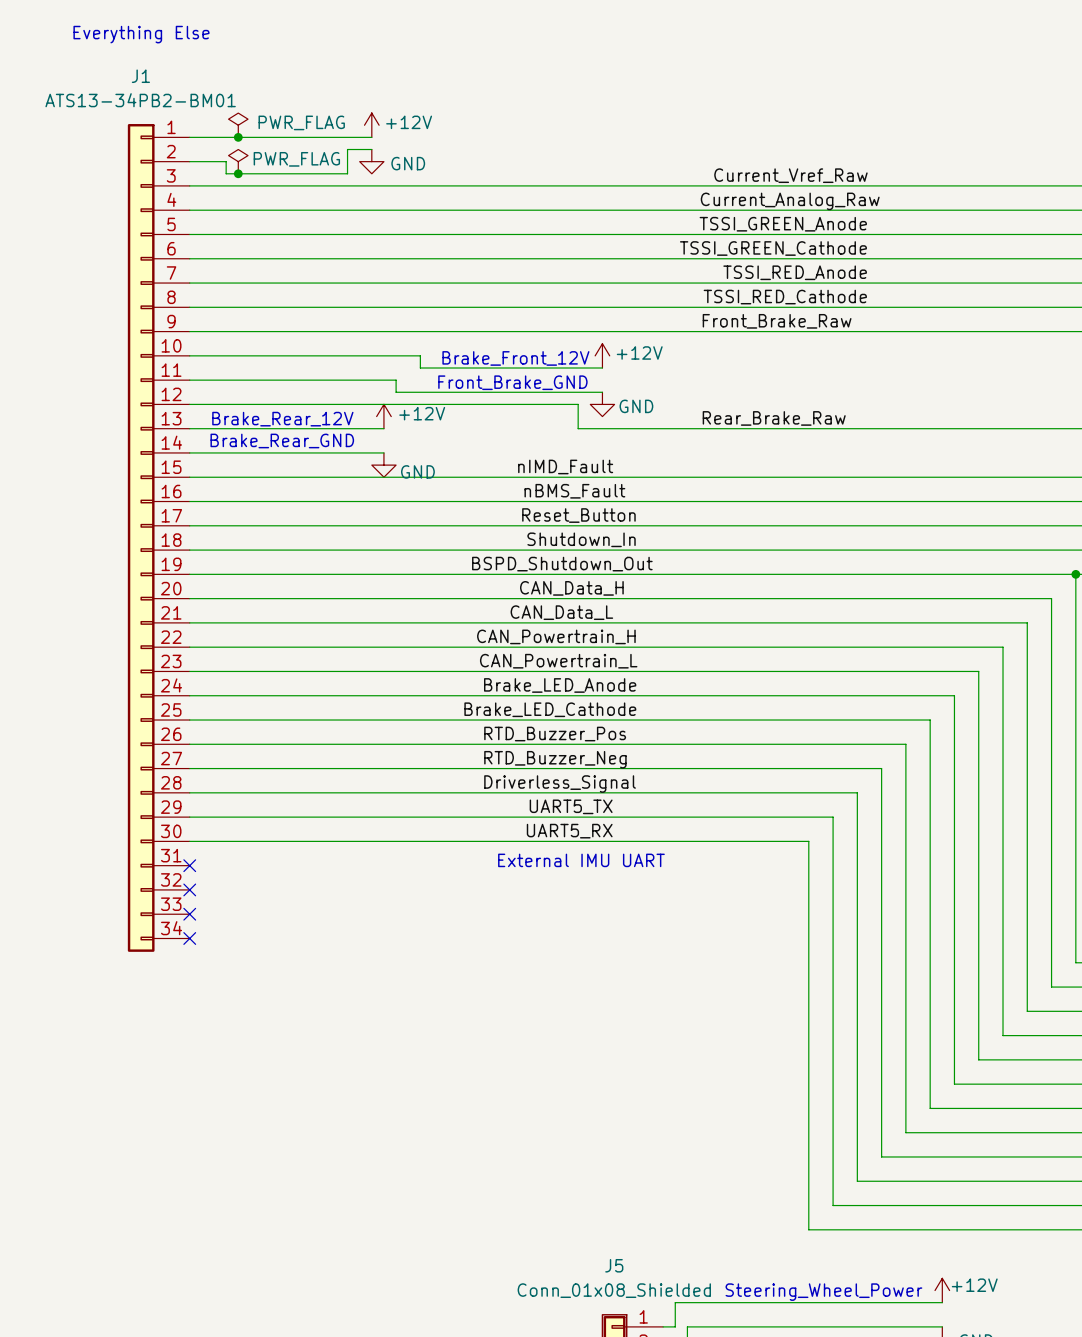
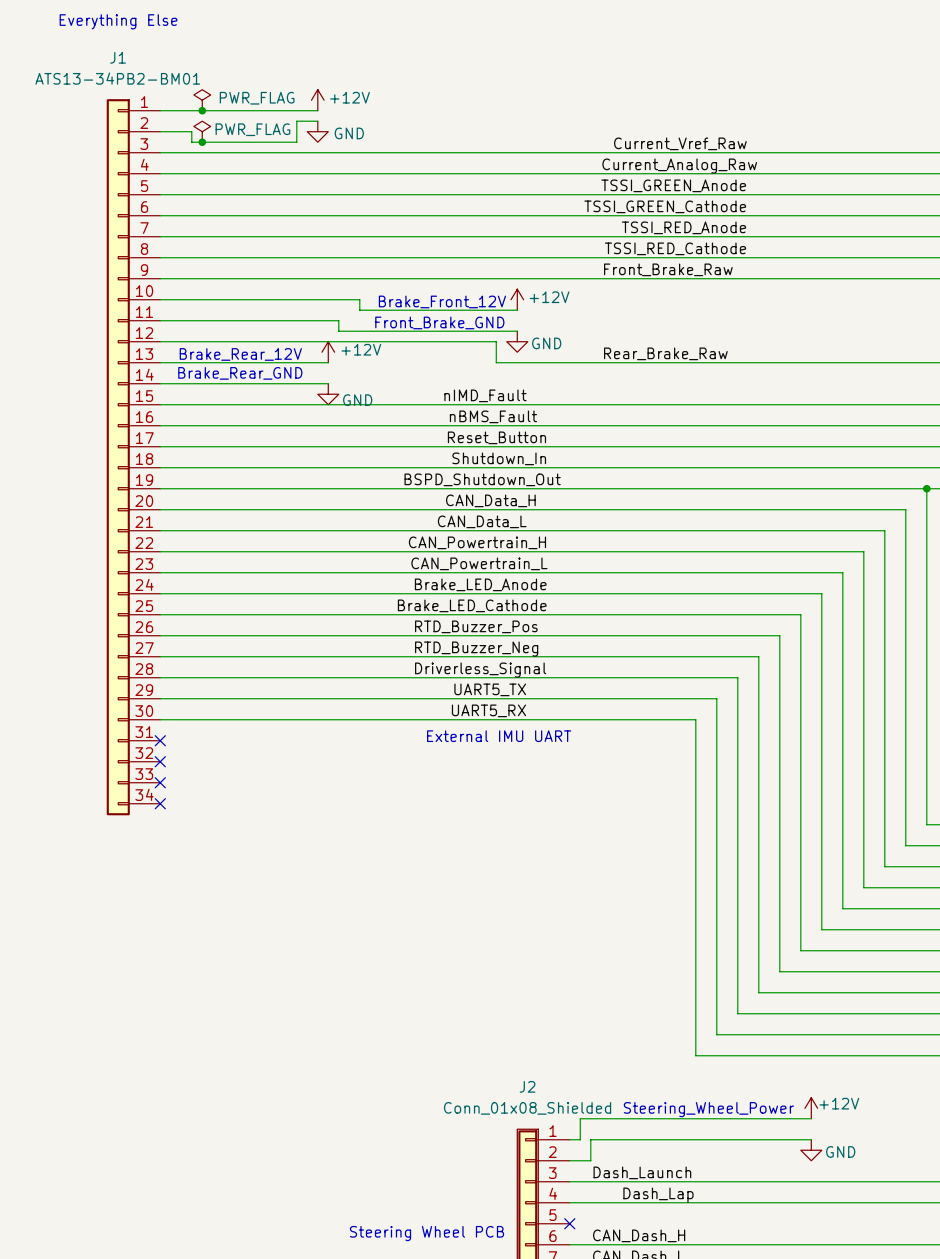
J5 name: J5 (614, 1265) -> J2 (527, 1086)

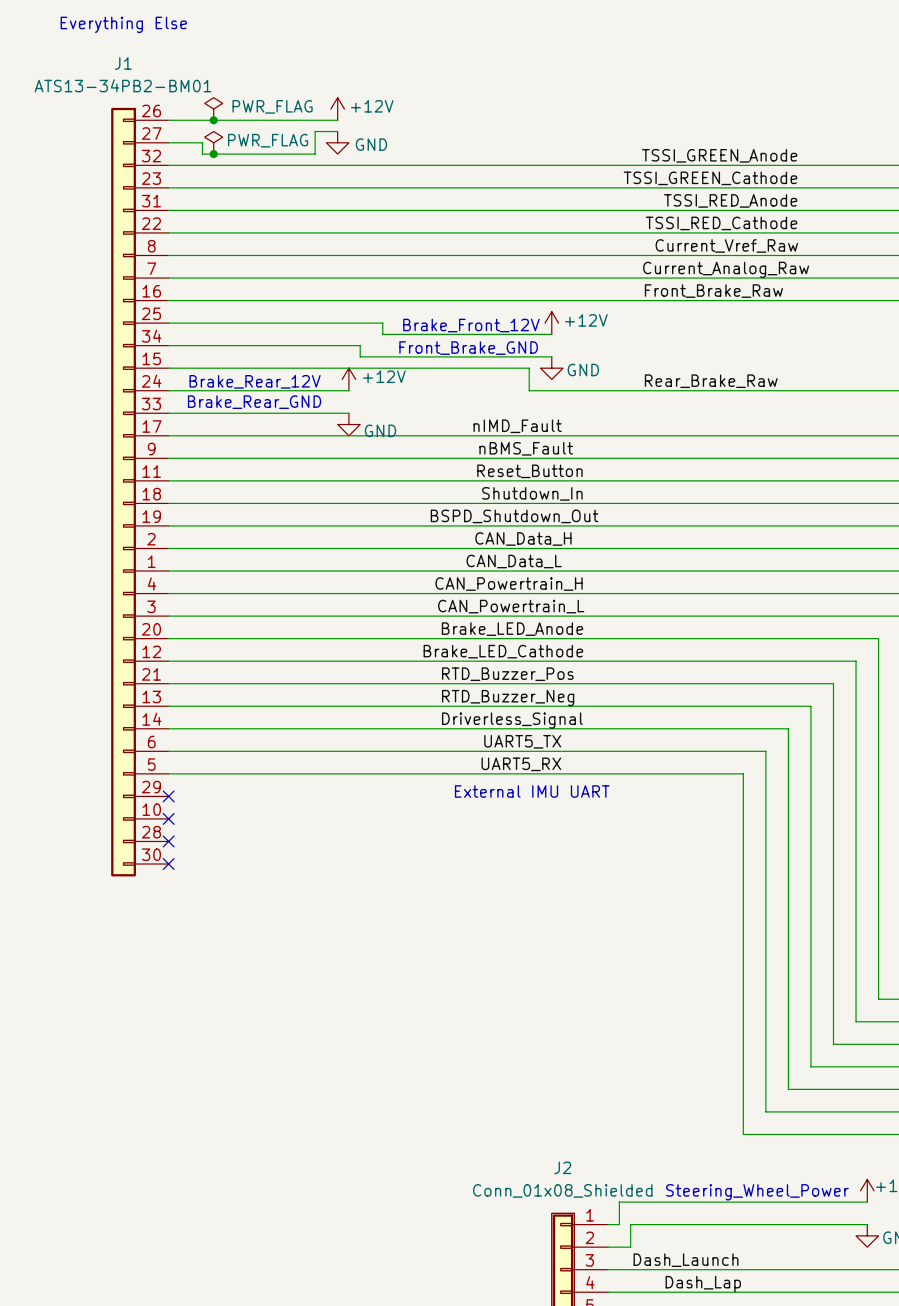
J1 symbol: [106, 99, 161, 816] -> [111, 107, 169, 877]
label: none -> TSSI_GREEN_Anode (719, 155)
label position: Current_Vref_Raw (680, 143) -> Current_Vref_Raw (726, 245)
label: none -> TSSI_GREEN_Cathode (710, 178)
label position: Current_Analog_Raw (679, 166) -> Current_Analog_Raw (726, 269)
label: TSSI_GREEN_Anode (673, 185) -> TSSI_RED_Anode (730, 200)
label: TSSI_GREEN_Cathode (665, 206) -> TSSI_RED_Cathode (721, 223)
label: TSSI_RED_Anode (683, 227) -> none
label: TSSI_RED_Cathode (675, 248) -> none

